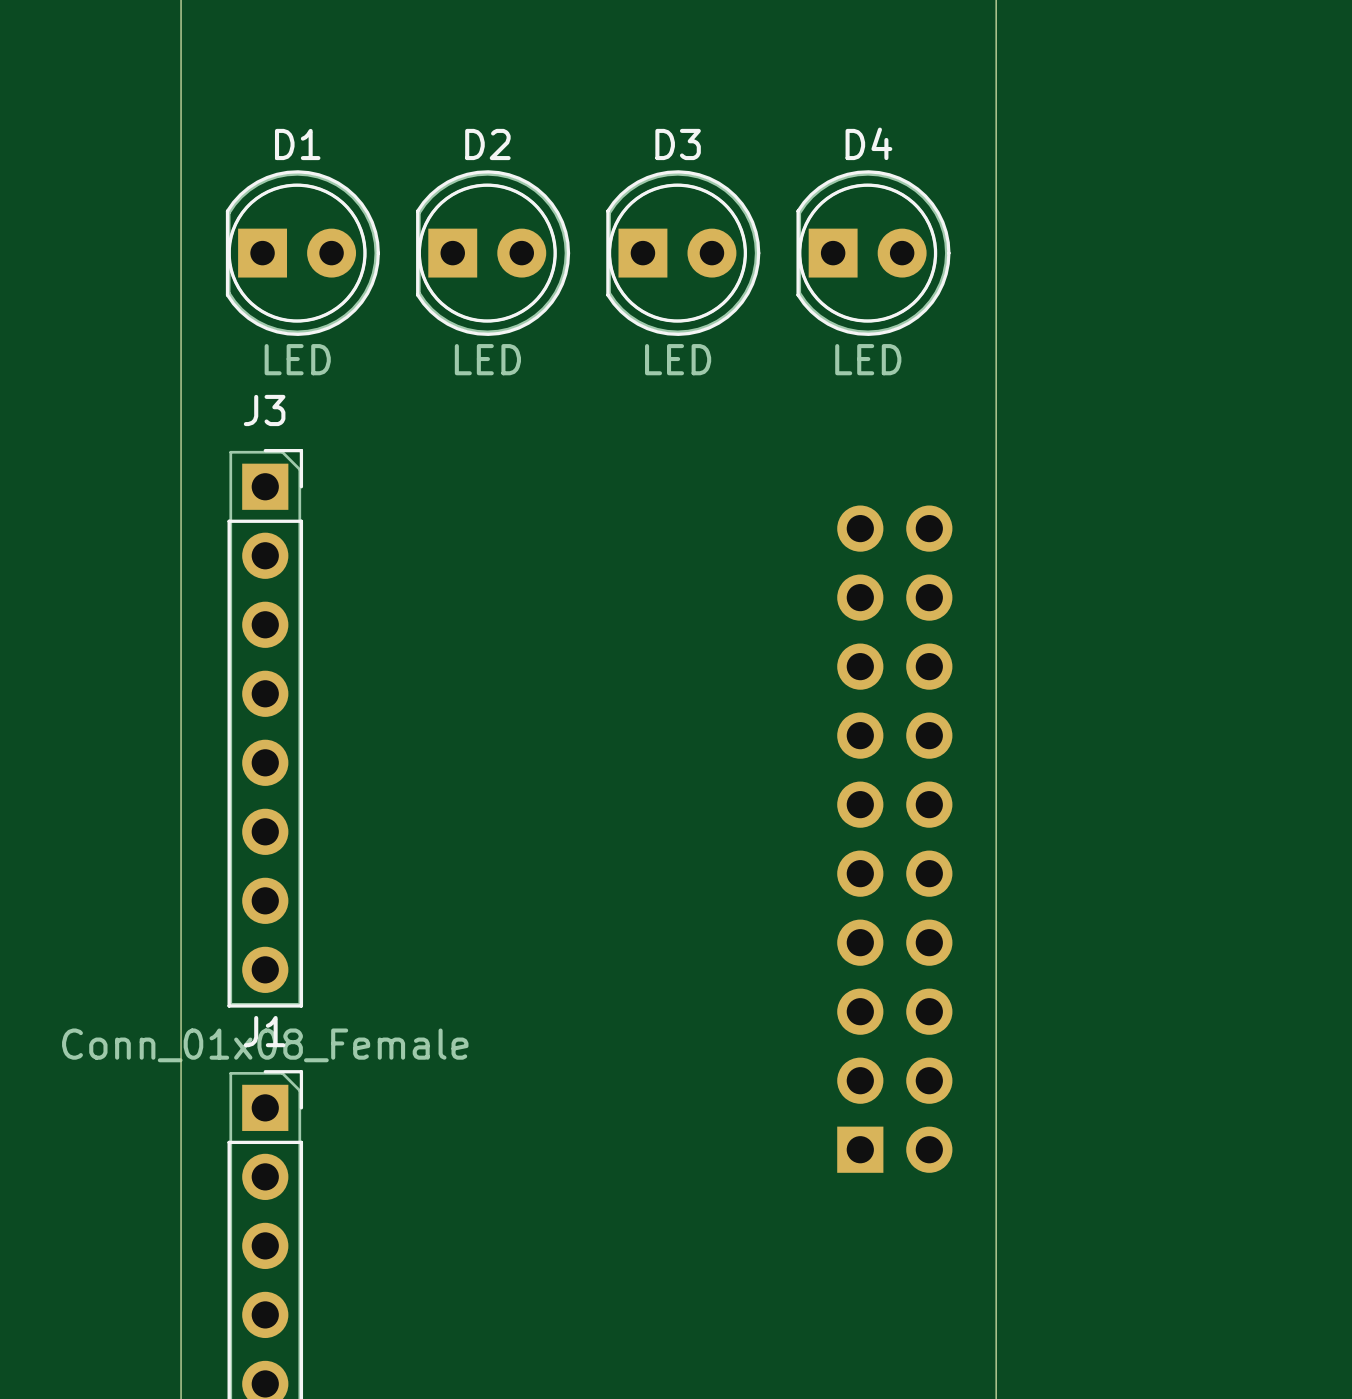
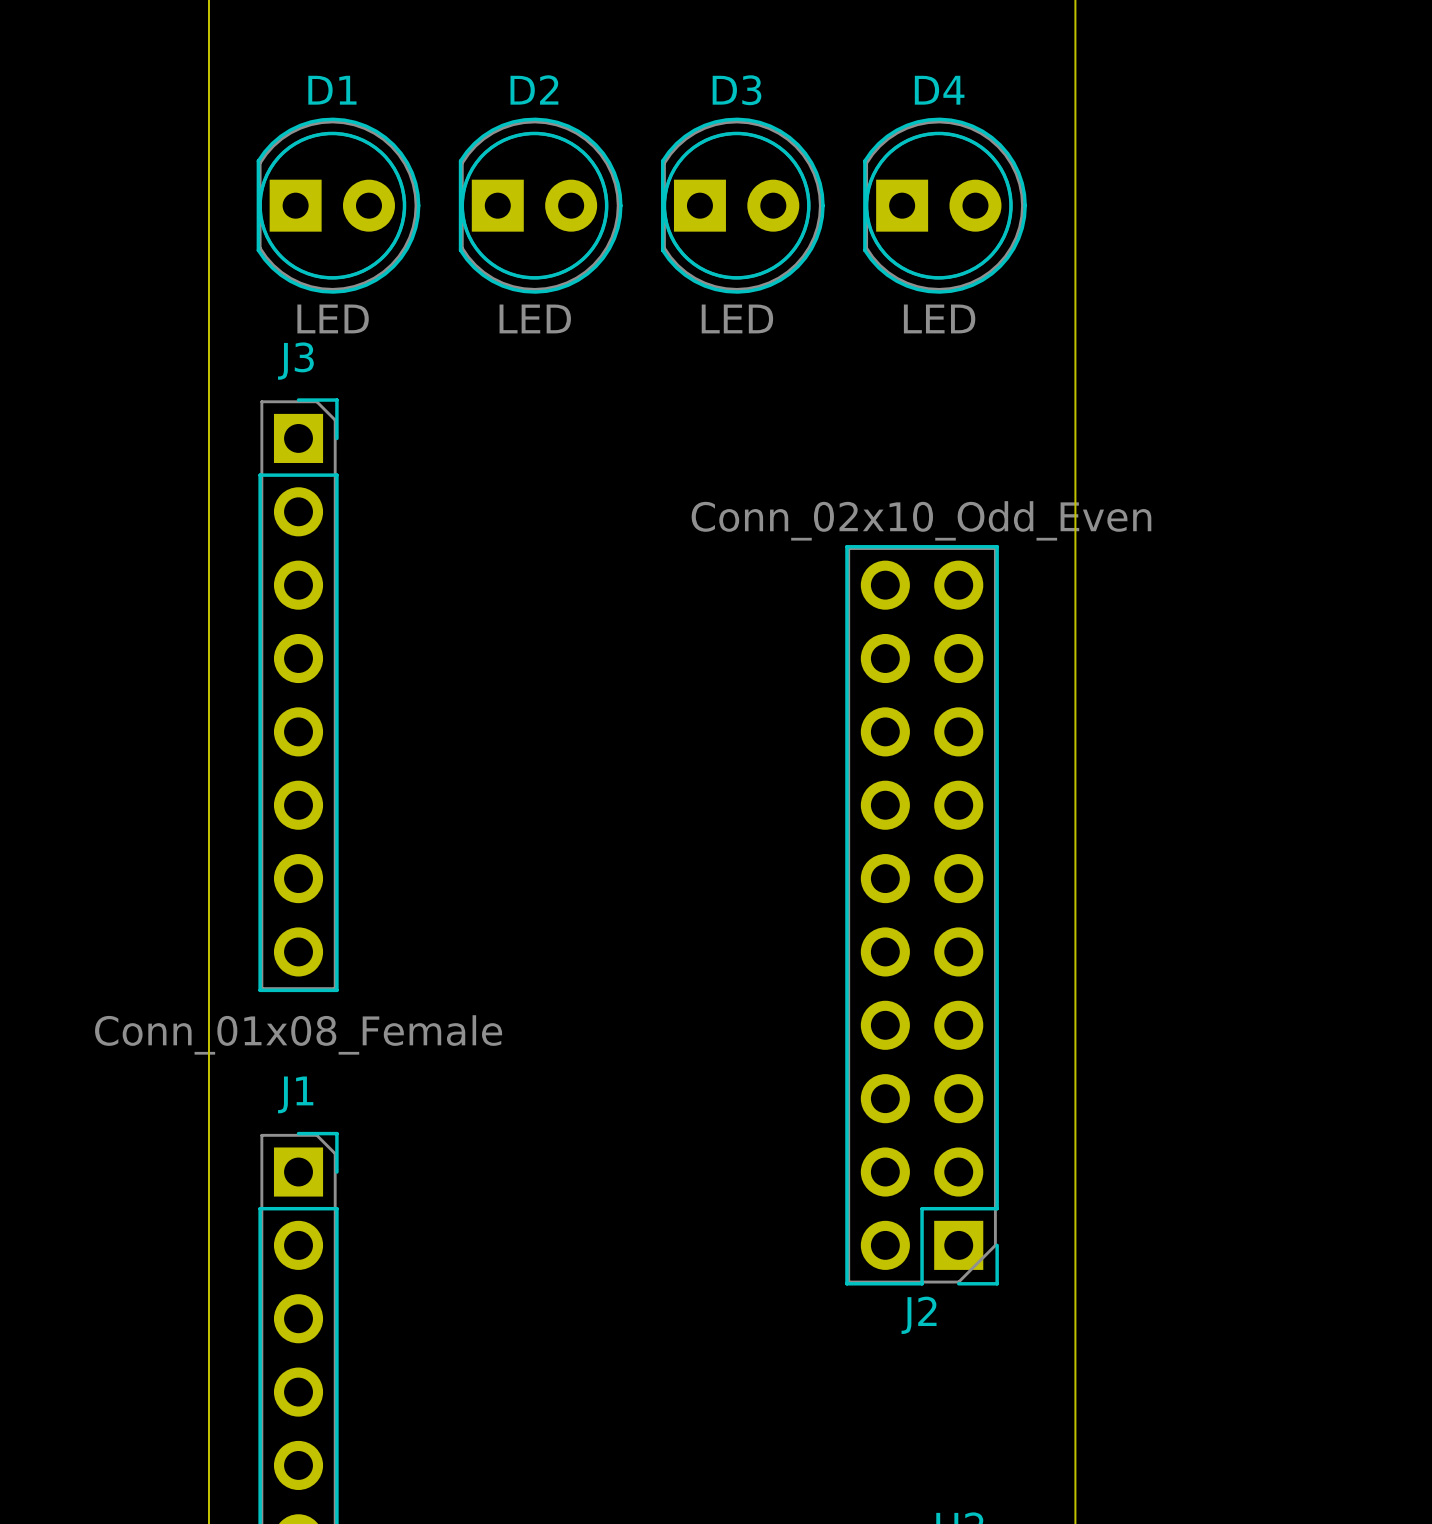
D1 position: (302, 253) -> (338, 205)
D2 position: (493, 253) -> (540, 205)
D3 position: (683, 253) -> (742, 205)
D4 position: (873, 253) -> (945, 205)
J3 position: (265, 728) -> (298, 695)
J2 side: bottom (894, 839) -> top (922, 915)

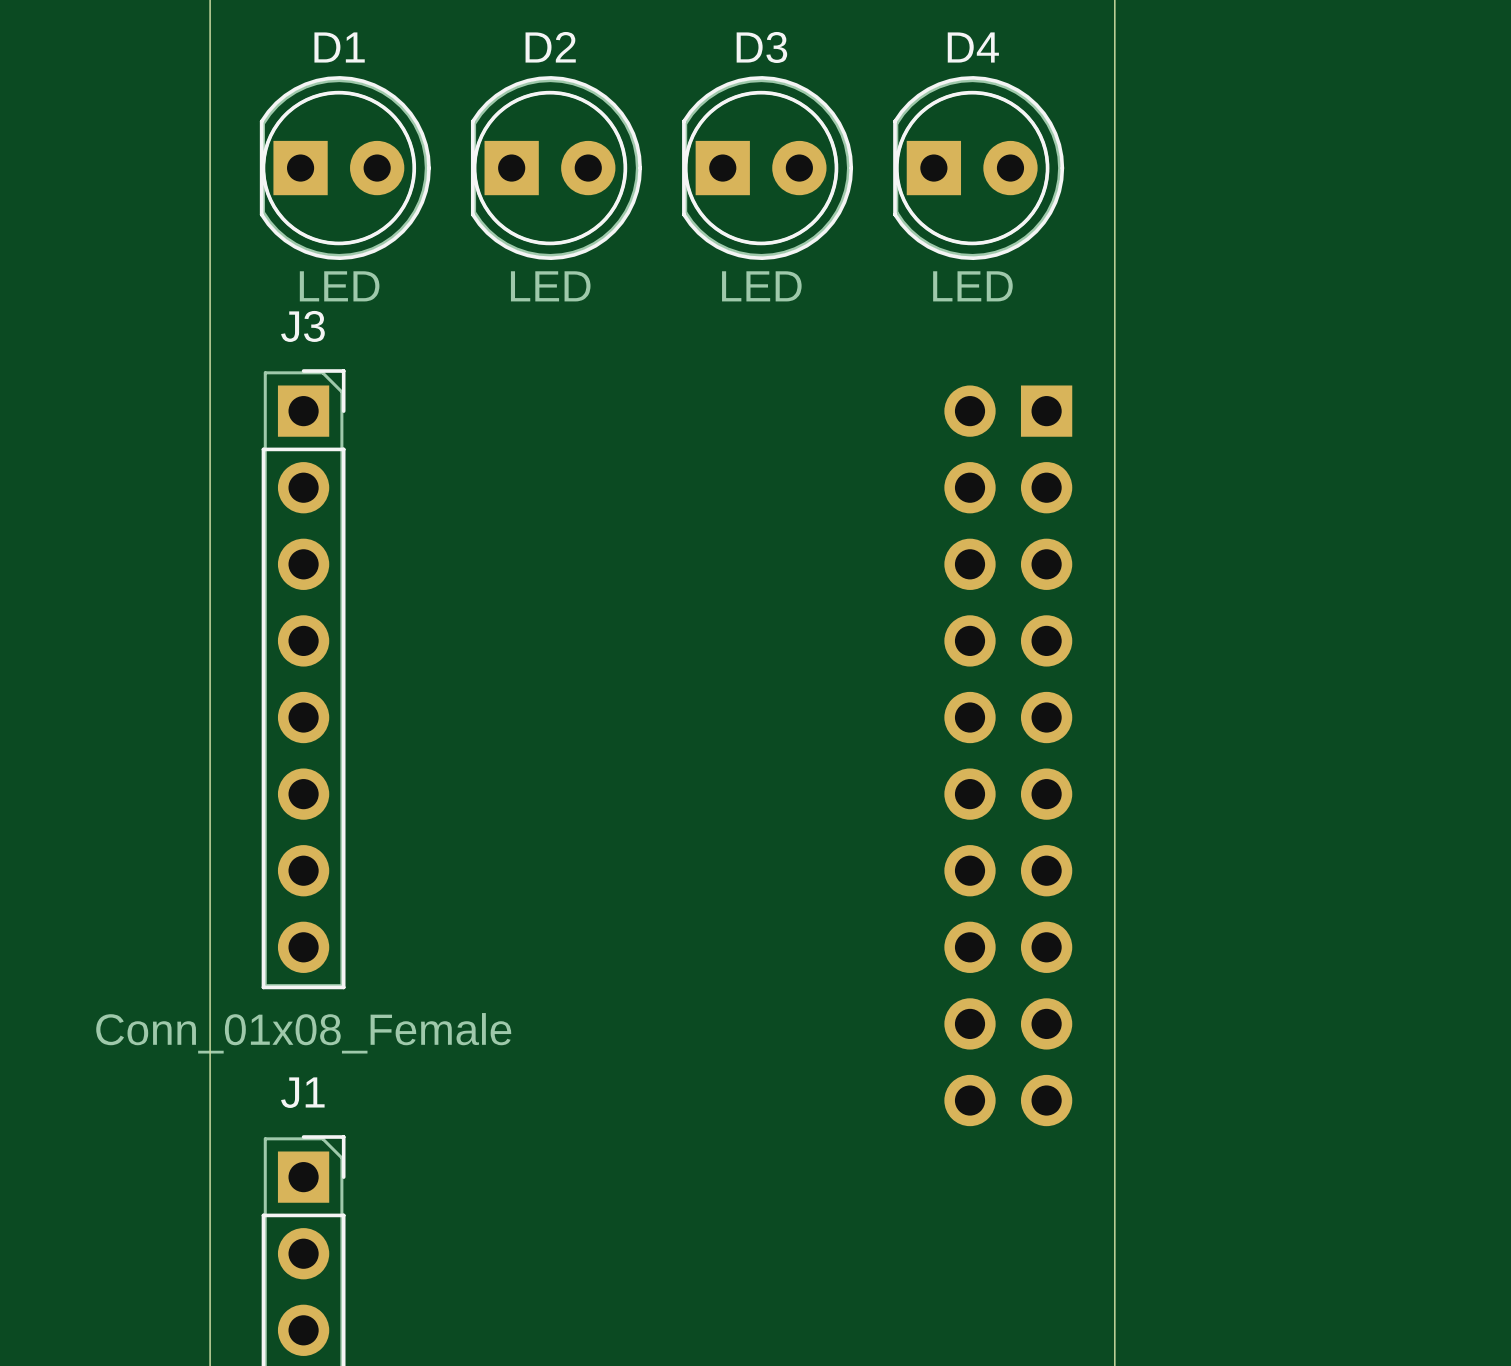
part: none -> (1008, 755)
J2: Conn_02x10_Odd_Even (922, 915) -> none

